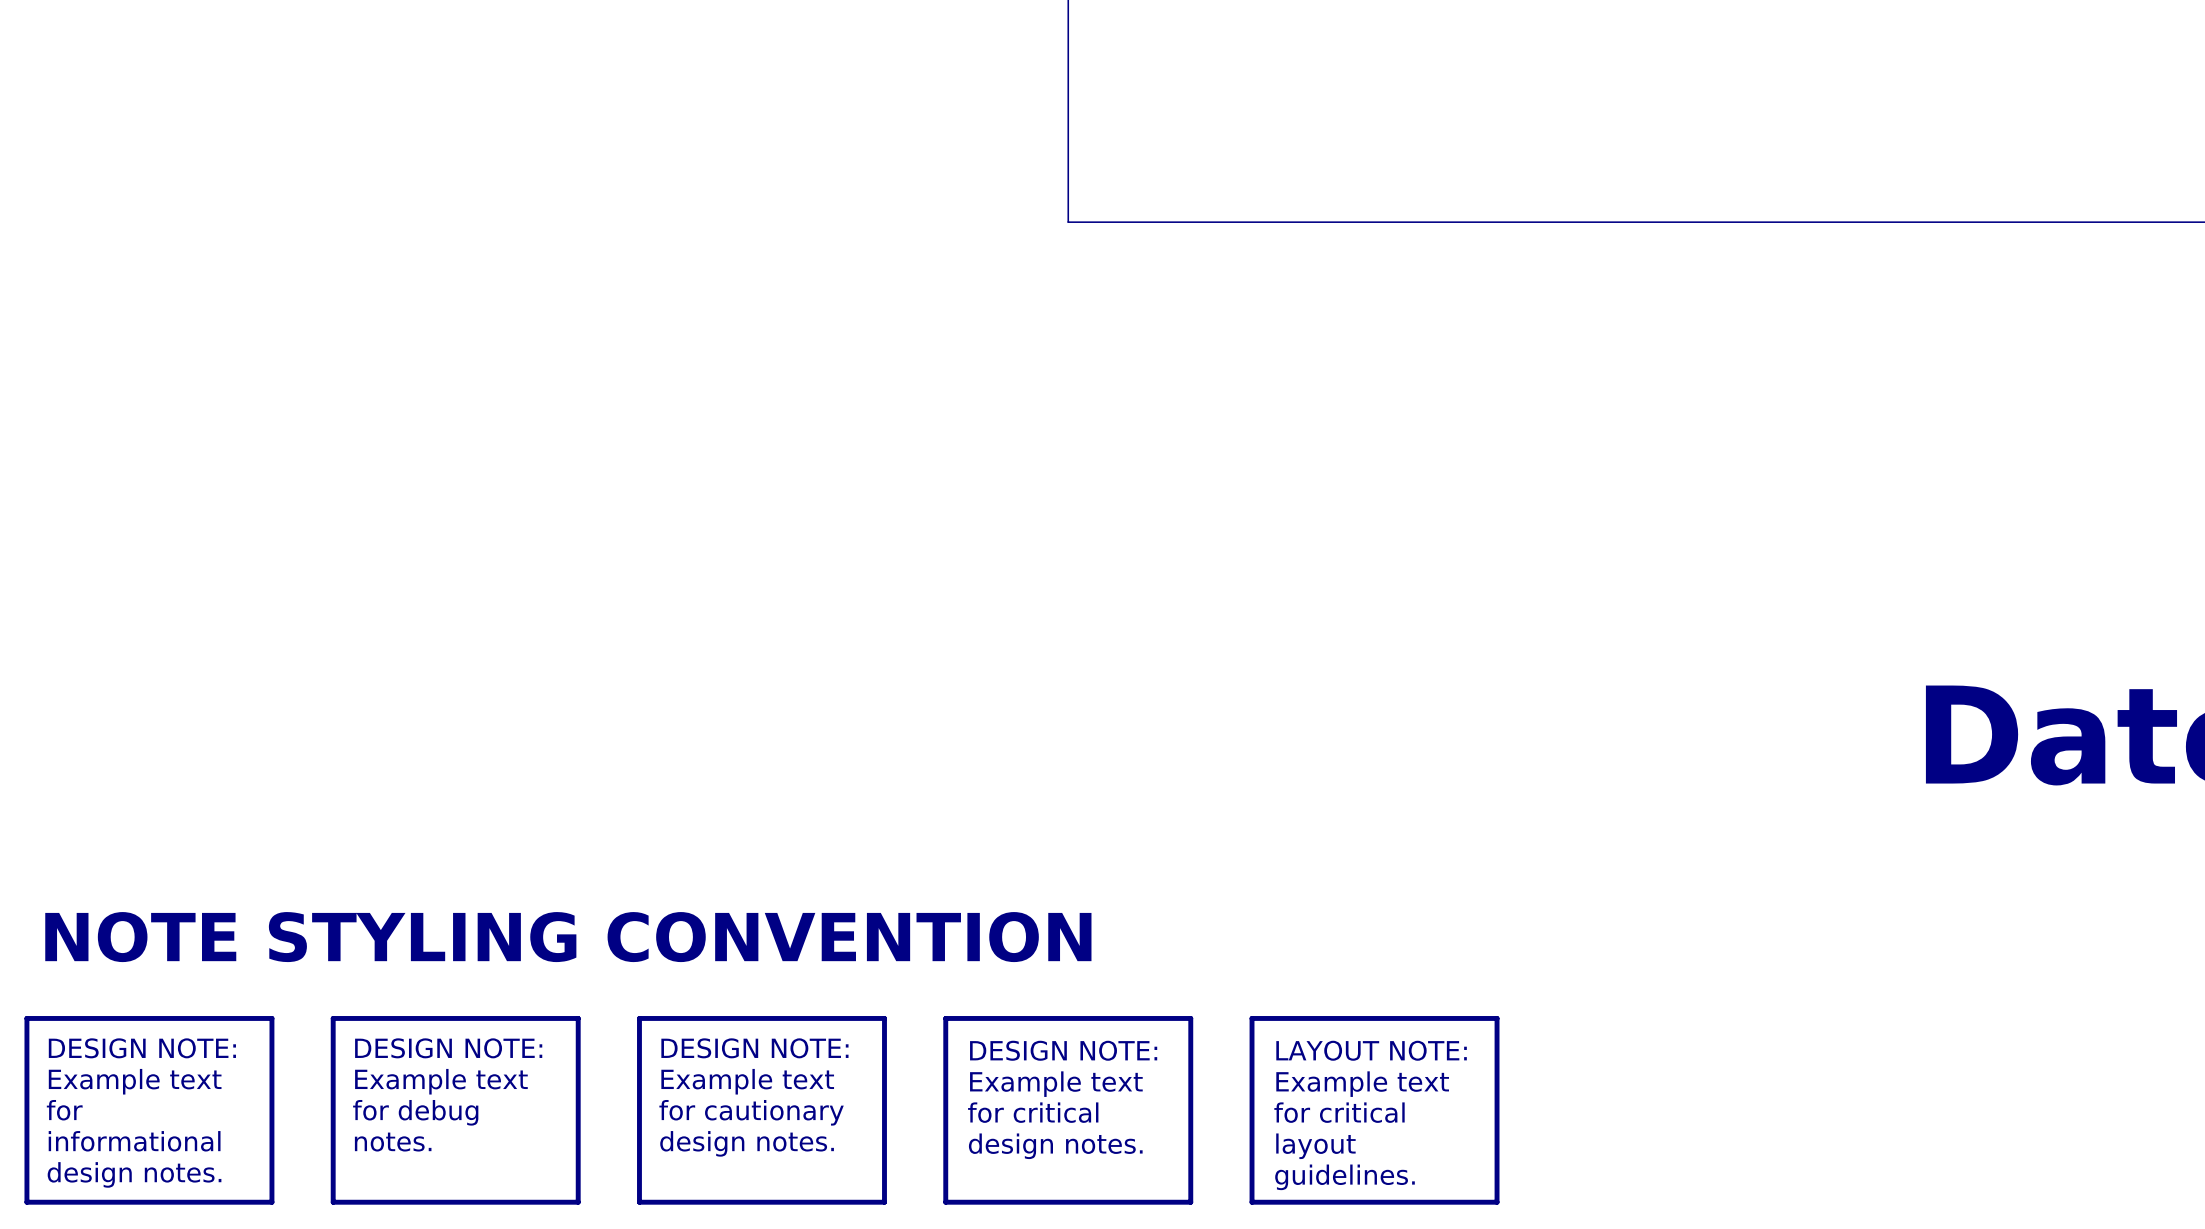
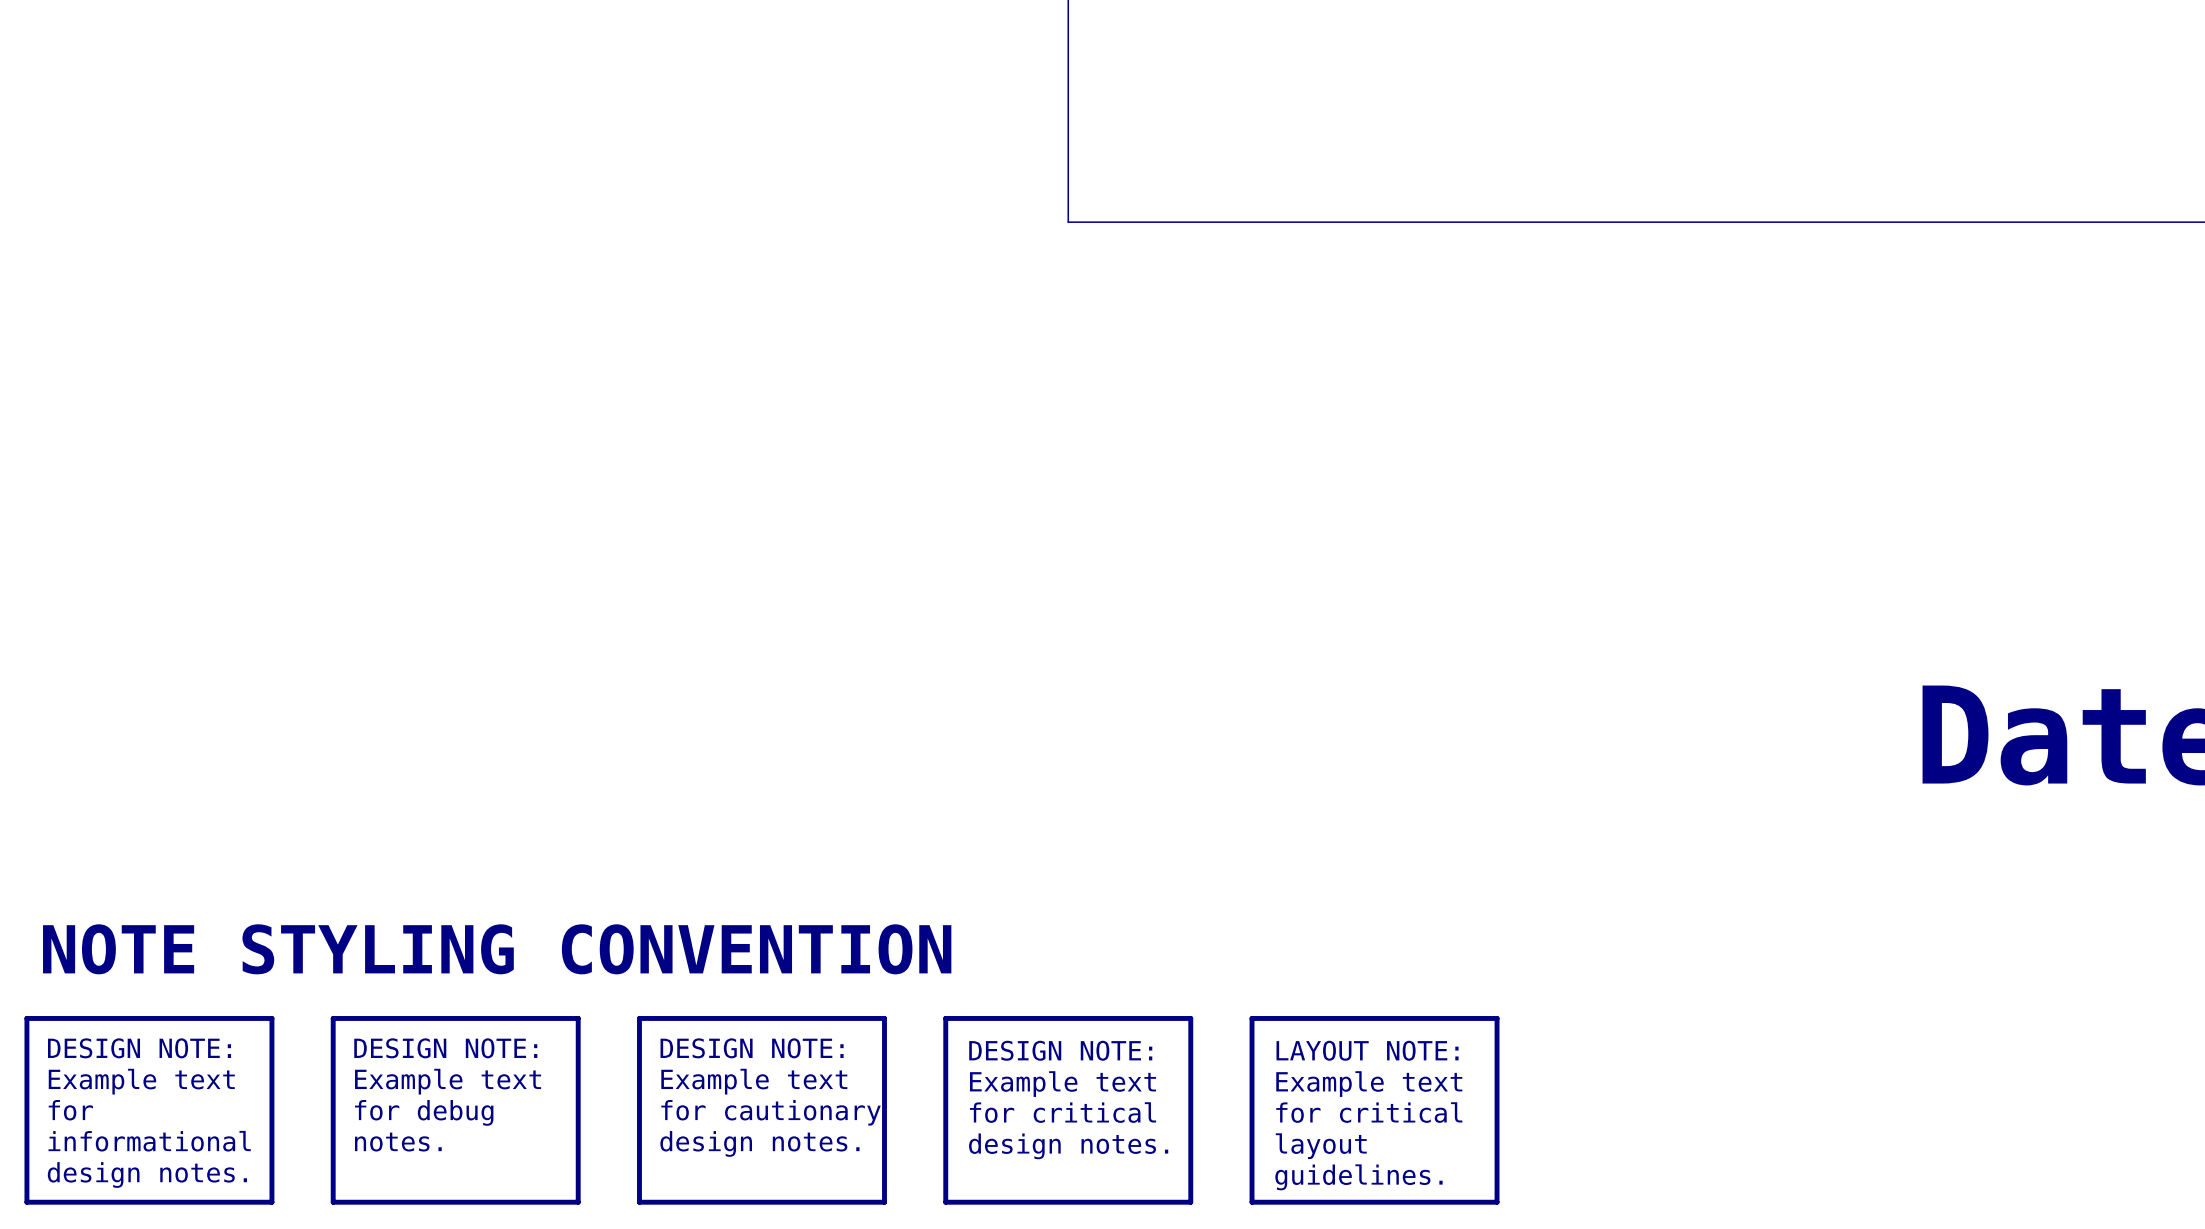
text position: NOTE STYLING CONVENTION (568, 937) -> NOTE STYLING CONVENTION (497, 949)

